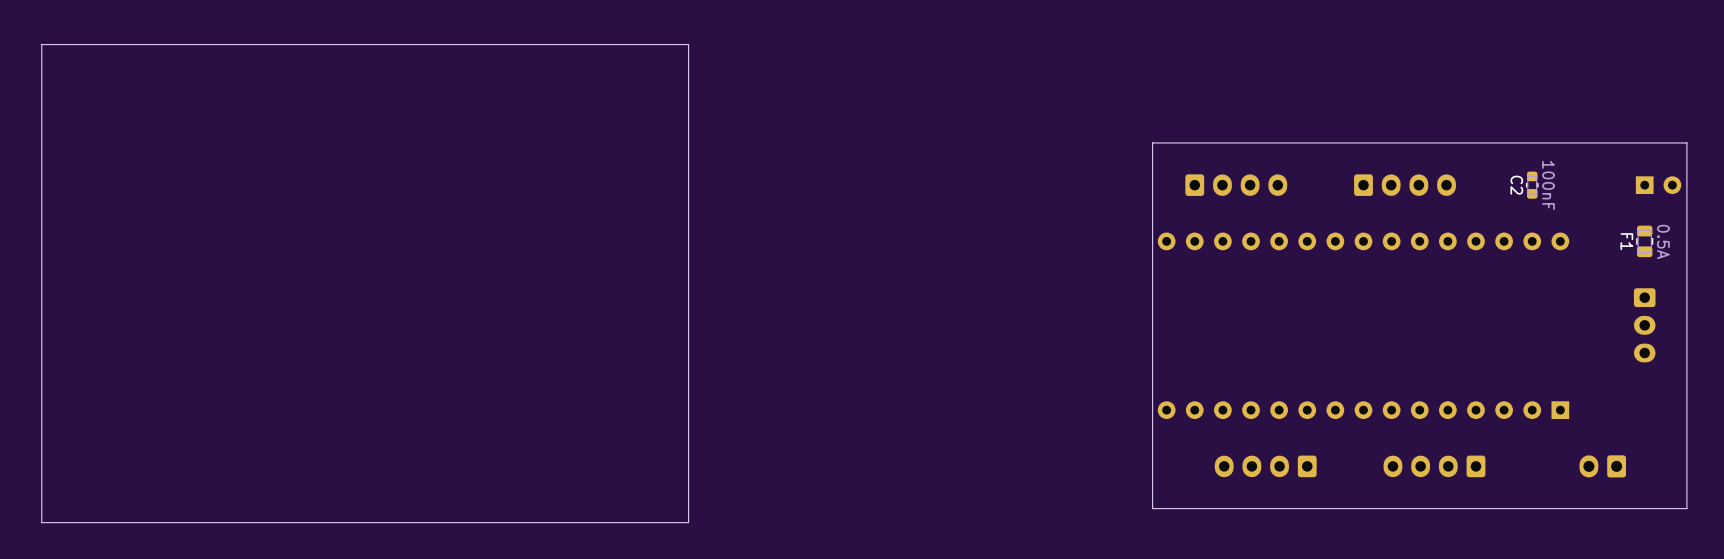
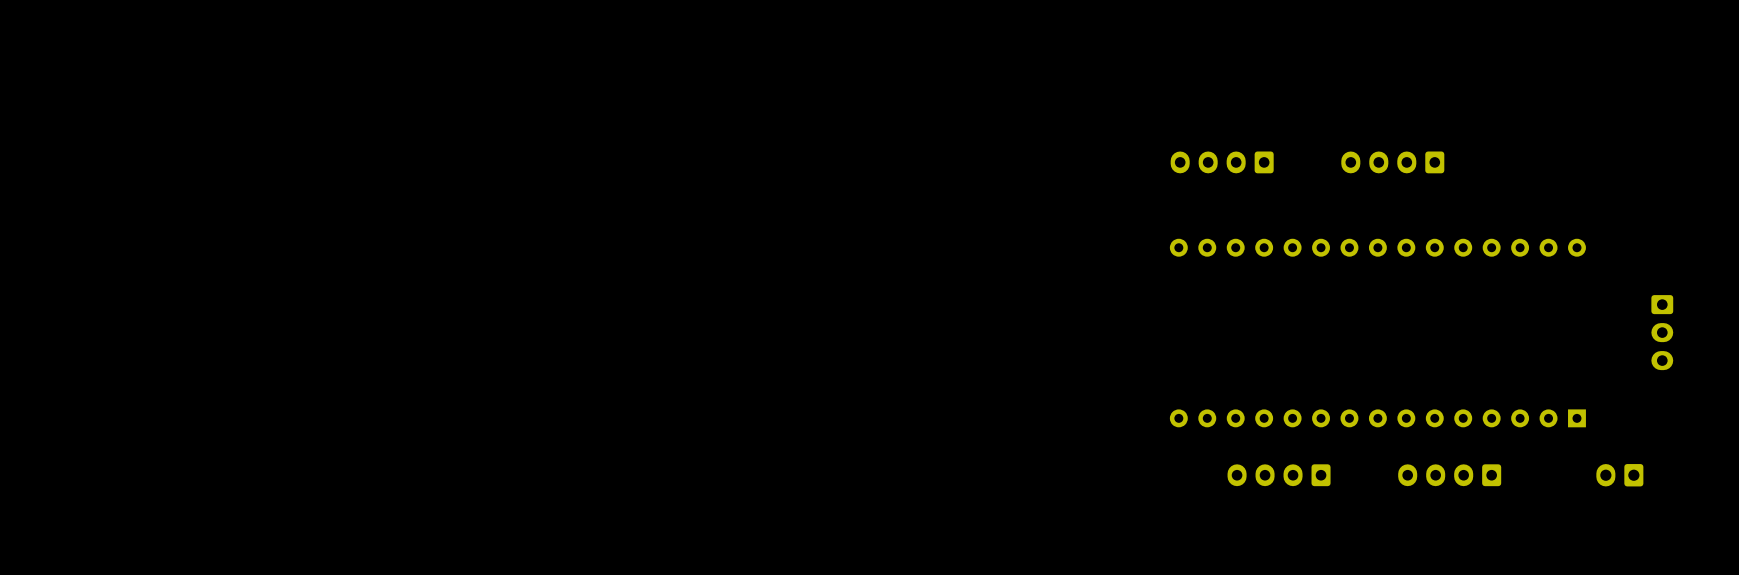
board edge: (688, 44) (41, 44) (41, 522) (688, 522) (688, 44) -> none
board edge: (1686, 142) (1686, 508) (1152, 508) (1152, 142) (1686, 142) -> none
part rotation: 0° (1236, 185) -> 180° (1222, 162)
part rotation: 0° (1405, 185) -> 180° (1392, 162)
C2: 100nF (1532, 185) -> none
part: (1658, 185) -> none
F1: 0.5A (1644, 241) -> none

